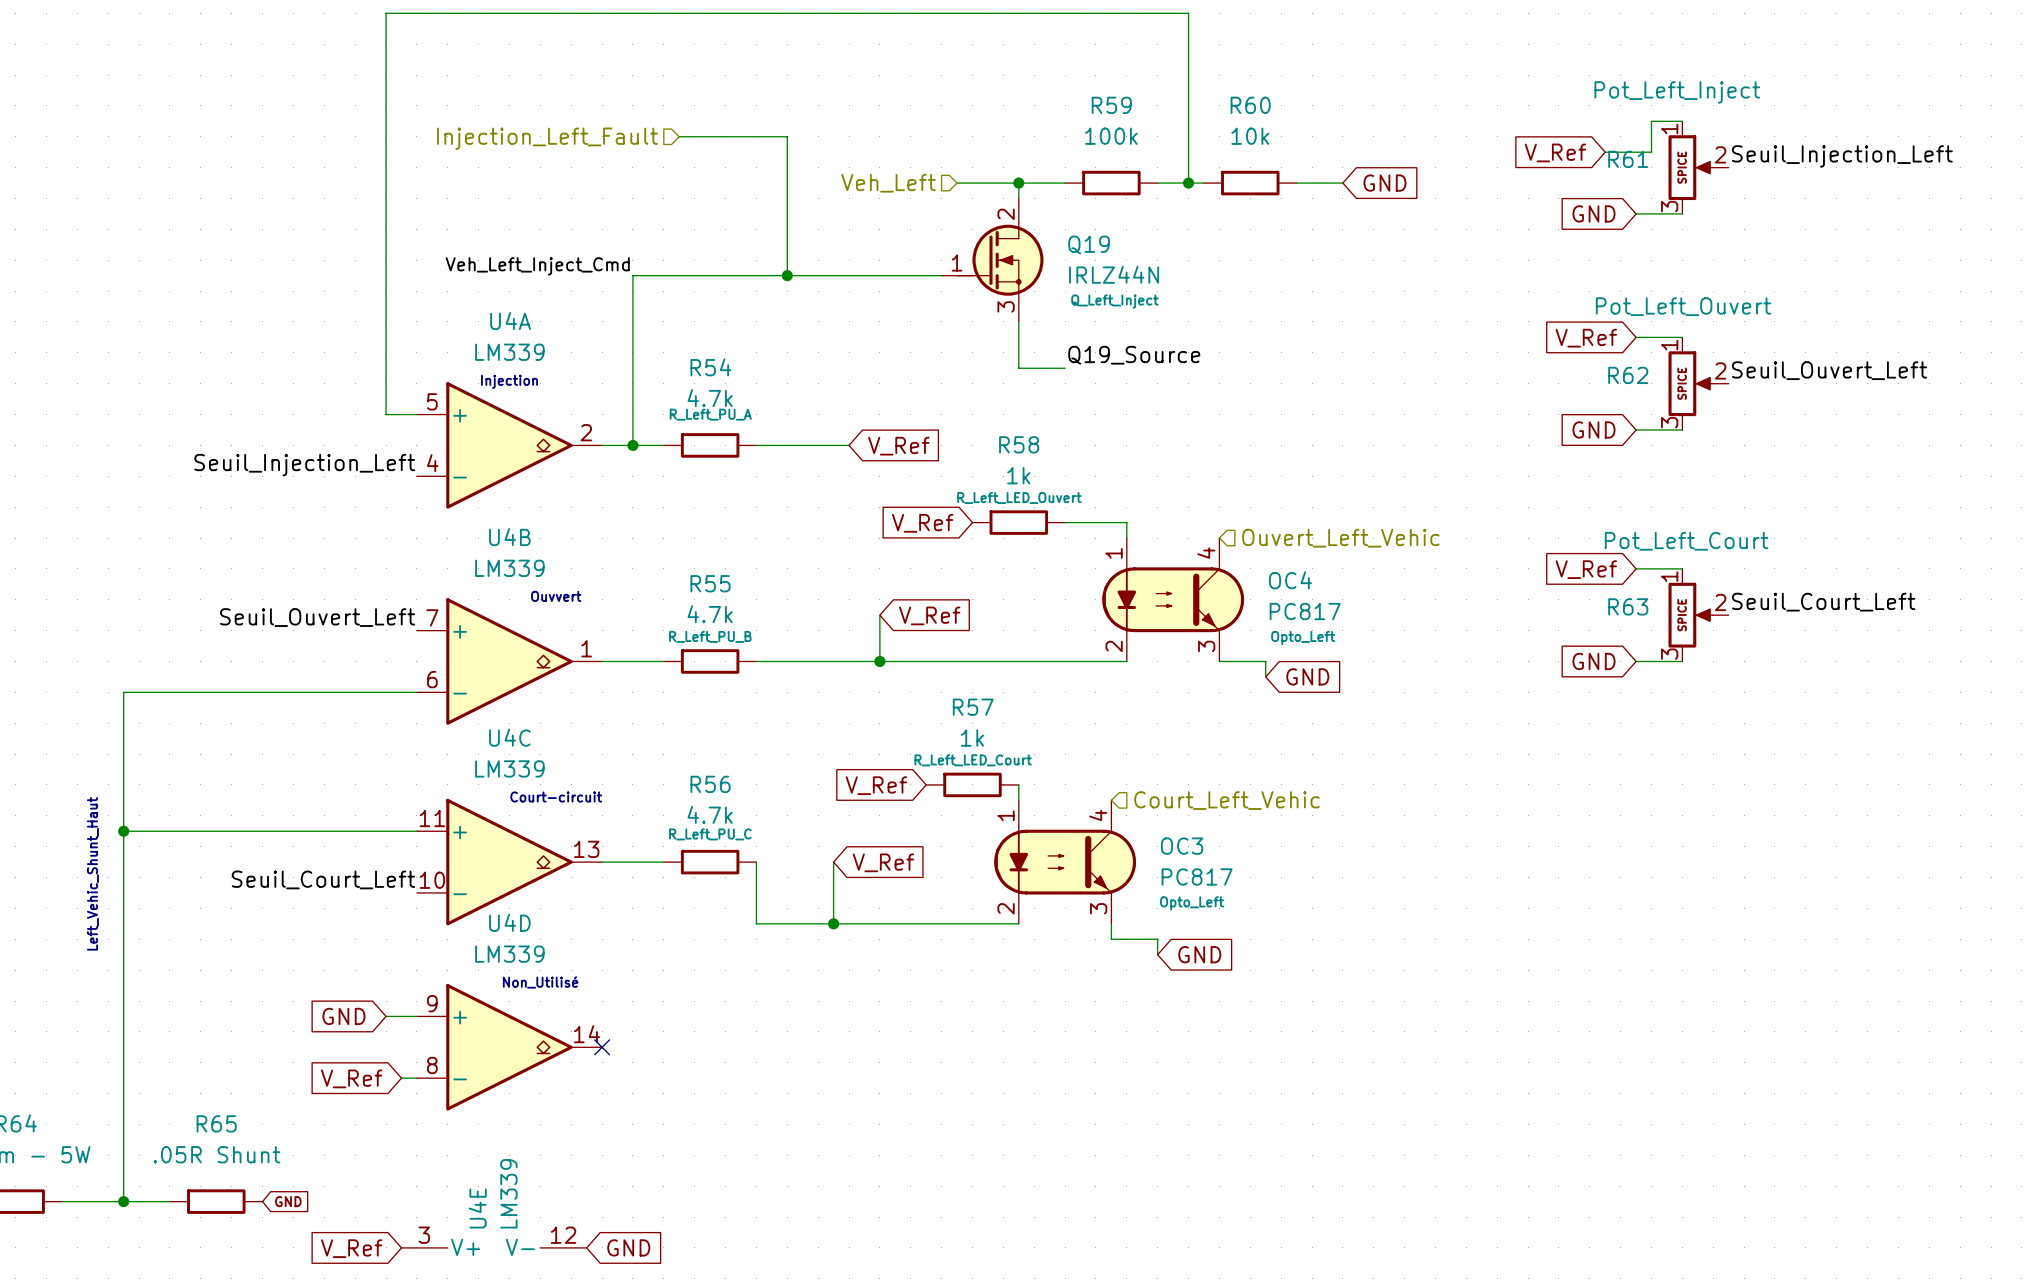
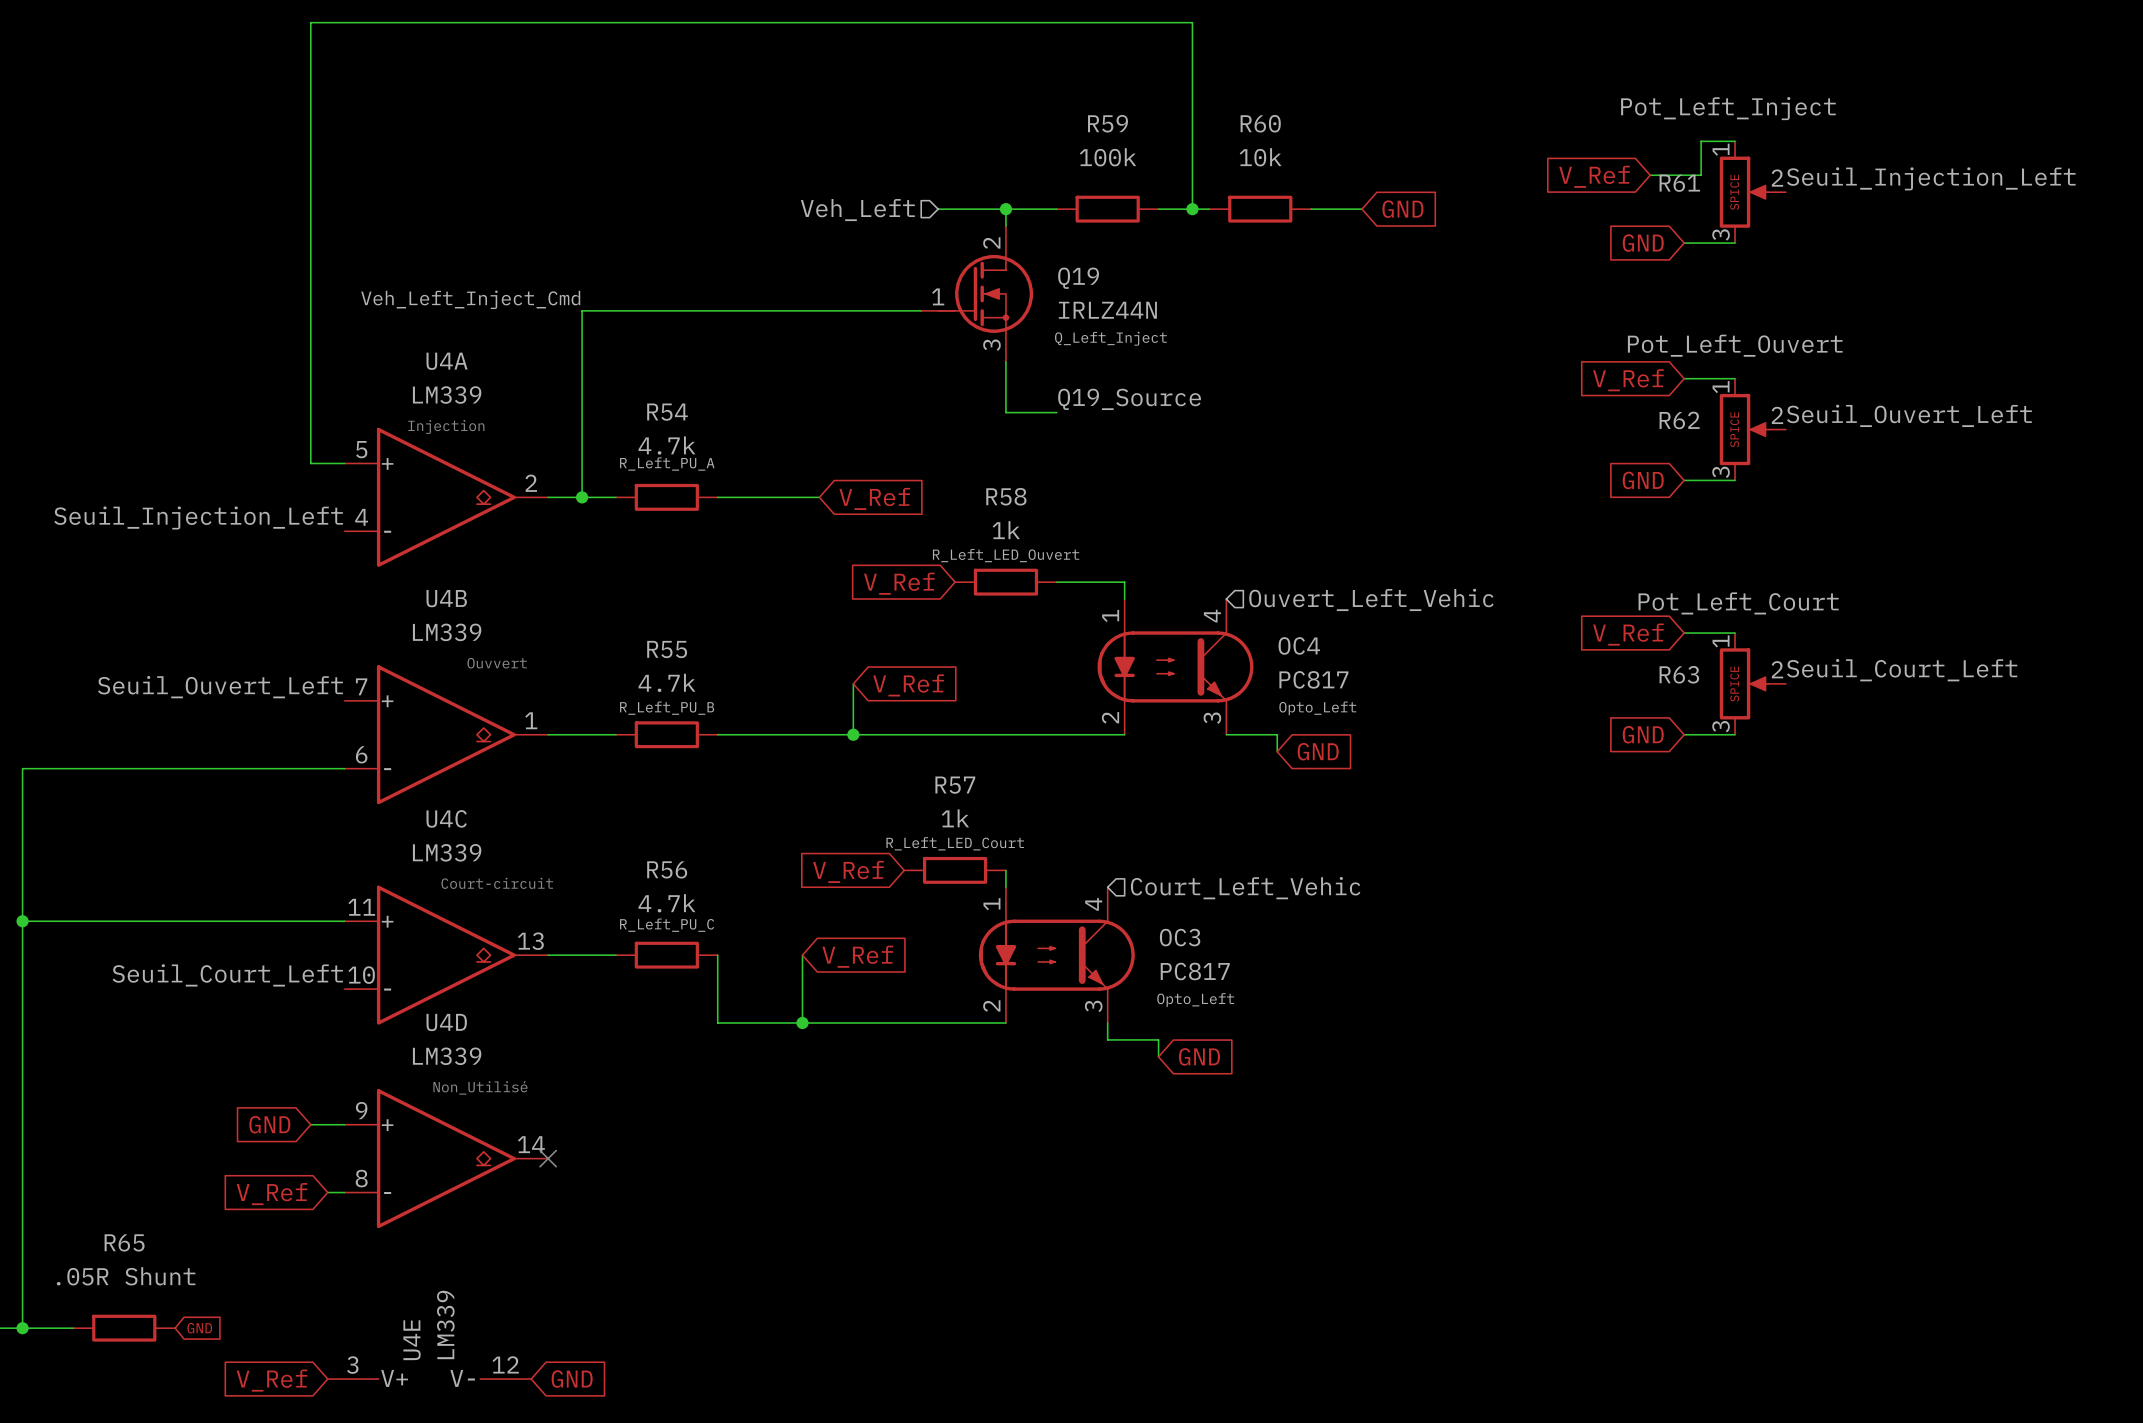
wire: (679, 136) (787, 136) (787, 275) -> none
hierarchical label: Injection_Left_Fault (547, 138) -> none
junction: (787, 275) -> none

